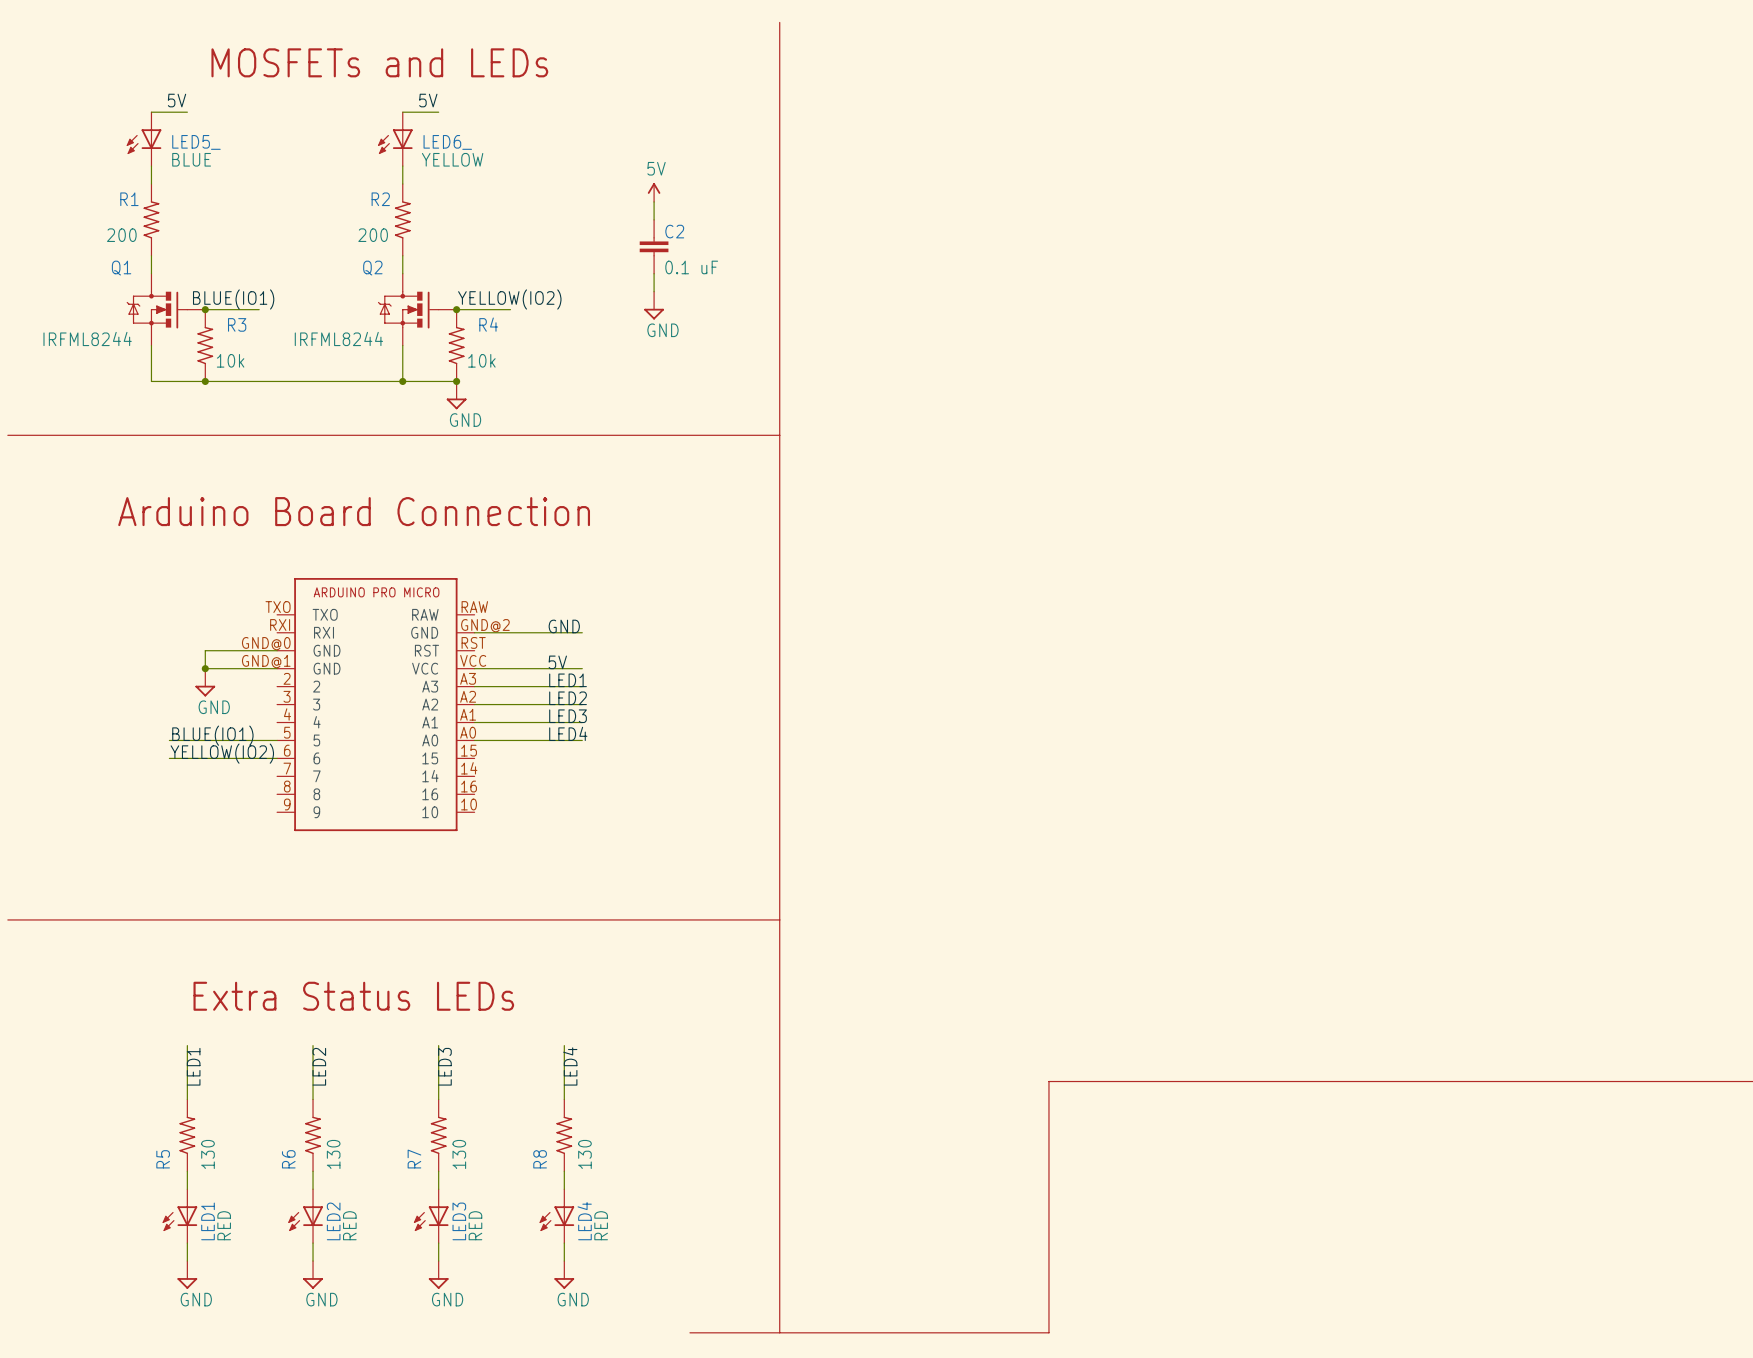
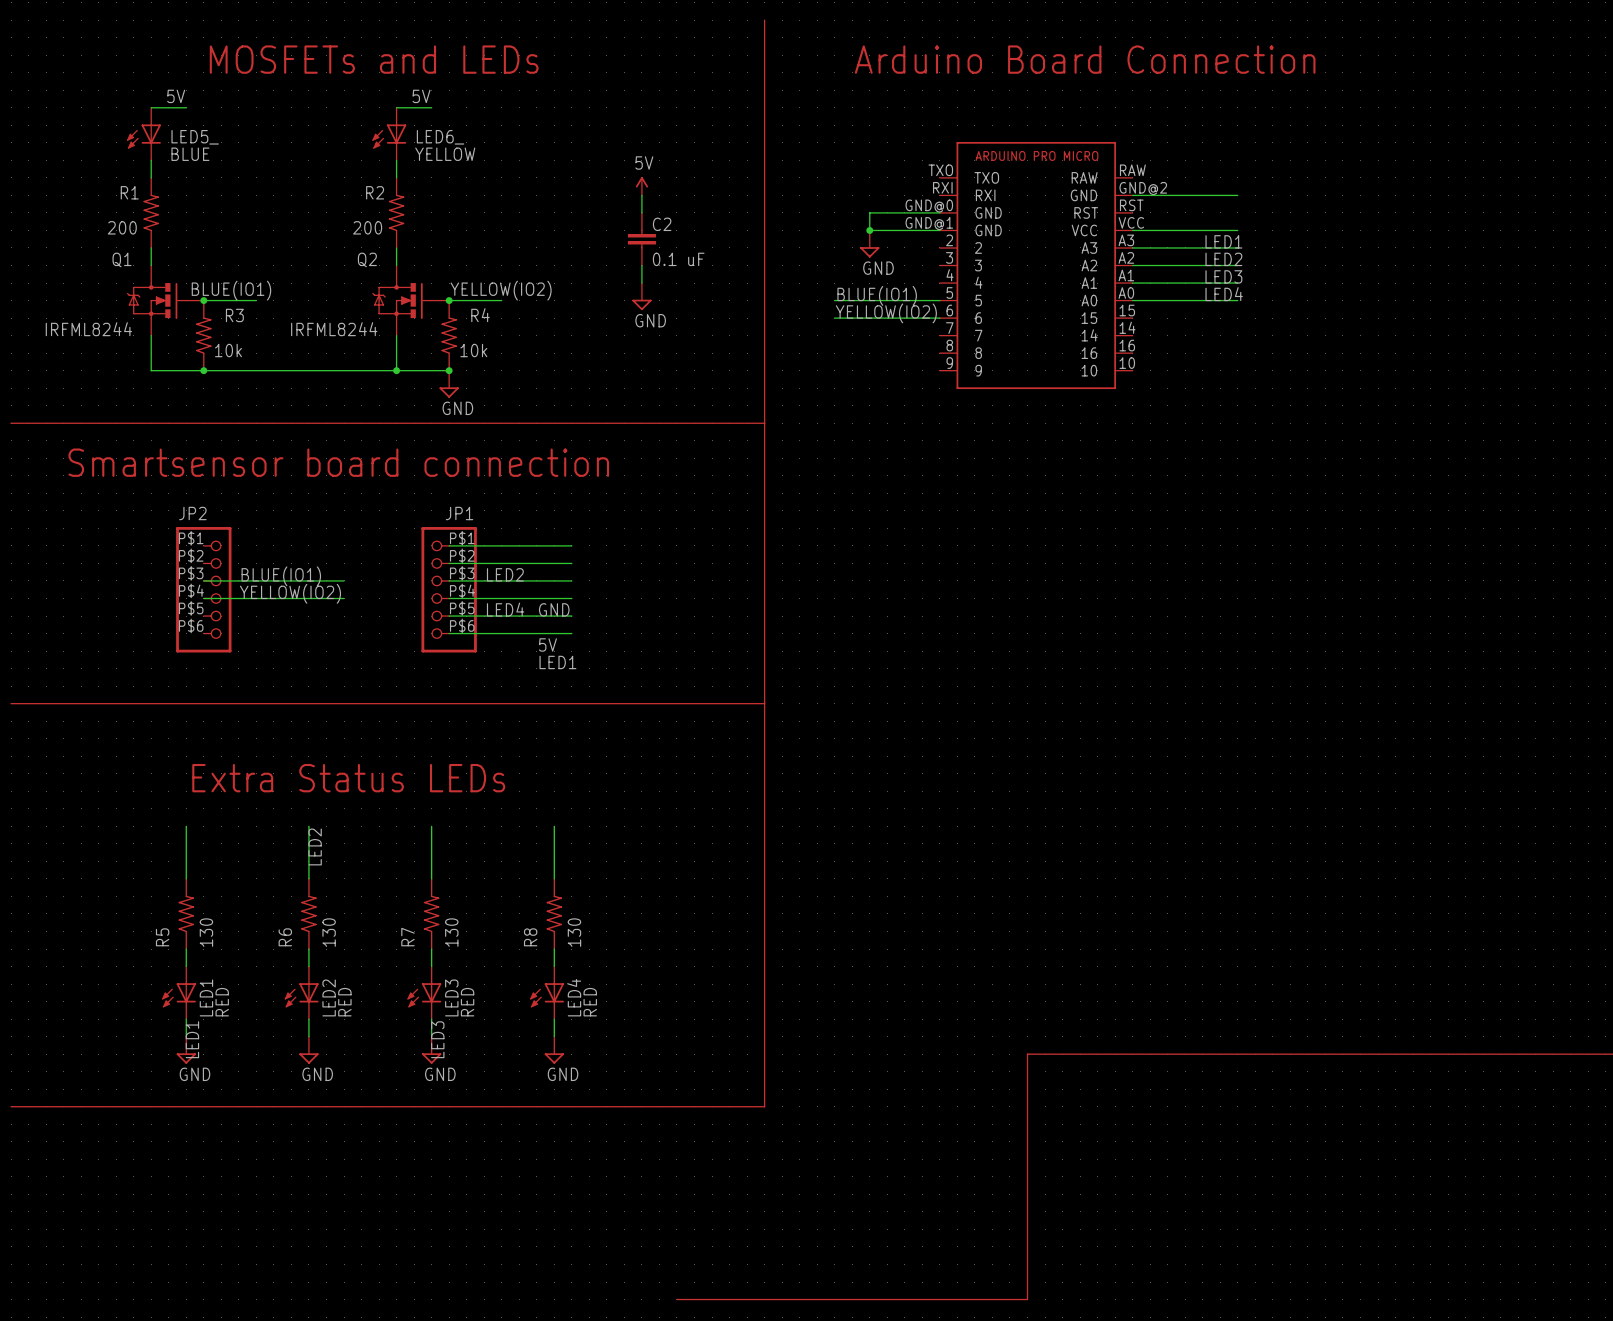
text: none -> Arduino Board Connection (1085, 59)
wire: none -> (1132, 195) (1237, 195)
wire: none -> (939, 212) (869, 212) (869, 230) (939, 230)
junction: none -> (869, 230)
wire: none -> (1132, 230) (1237, 230)
label: none -> LED1 (1223, 241)
power symbol: none -> GND (869, 244)
wire: none -> (1132, 247) (1237, 247)
label: none -> LED2 (1223, 259)
part: none -> (1036, 265)
wire: none -> (1132, 265) (1237, 265)
label: none -> LED3 (1223, 276)
wire: none -> (1132, 283) (1237, 283)
label: none -> LED4 (1224, 294)
label: none -> BLUE(IO1) (877, 295)
wire: none -> (834, 300) (939, 300)
wire: none -> (1132, 300) (1237, 300)
label: none -> YELLOW(IO2) (886, 313)
wire: none -> (834, 318) (939, 318)
text: Arduino Board Connection (354, 511) -> Smartsensor board connection (338, 462)
wire: none -> (449, 545) (571, 545)
wire: none -> (449, 563) (571, 563)
wire: none -> (203, 580) (344, 580)
wire: none -> (449, 580) (571, 580)
JP2: none -> (203, 589)
JP1: none -> (449, 589)
wire: none -> (203, 598) (344, 598)
wire: none -> (449, 598) (571, 598)
wire: (277, 650) (205, 650) (205, 668) (277, 668) -> none
wire: none -> (449, 633) (571, 633)
junction: (205, 668) -> none
wire: (474, 668) (582, 668) -> none
power symbol: GND (205, 682) -> none
wire: (474, 686) (582, 686) -> none
label position: LED2 (568, 698) -> LED2 (505, 574)
part: (375, 704) -> none
wire: (474, 704) (582, 704) -> none
label: LED3 (568, 716) -> none
line: none -> (11, 703) (764, 703)
label position: LED4 (568, 733) -> LED4 (505, 609)
label position: BLUE(IO1) (212, 735) -> BLUE(IO1) (281, 576)
wire: (169, 740) (277, 740) -> none
wire: (474, 740) (582, 740) -> none
label position: YELLOW(IO2) (222, 753) -> YELLOW(IO2) (290, 593)
wire: (169, 758) (277, 758) -> none
text: none -> Extra Status LEDs (348, 778)
wire: none -> (186, 826) (186, 878)
wire: none -> (308, 826) (308, 878)
wire: none -> (431, 826) (431, 878)
wire: none -> (554, 826) (554, 878)
label: none -> LED2 (315, 846)
line: (7, 919) (779, 919) -> none
wire: none -> (186, 949) (186, 966)
wire: none -> (308, 949) (308, 966)
wire: none -> (431, 949) (431, 966)
wire: none -> (554, 949) (554, 966)
text: Extra Status LEDs (353, 996) -> none
label: LED2 (319, 1066) -> none
label: LED4 (570, 1066) -> none
power symbol: none -> GND (186, 1050)
power symbol: none -> GND (308, 1050)
power symbol: none -> GND (431, 1050)
power symbol: none -> GND (554, 1050)
R5 position: (187, 1135) -> (186, 913)
R6 position: (313, 1135) -> (308, 913)
R7 position: (438, 1135) -> (431, 913)
R8 position: (564, 1135) -> (554, 913)
line: (779, 1135) (779, 1332) -> (764, 1106) (11, 1106)
wire: (187, 1171) (187, 1189) -> none
wire: (313, 1171) (313, 1189) -> none
wire: (438, 1171) (438, 1189) -> none
wire: (564, 1171) (564, 1189) -> none
LED1 position: (179, 1216) -> (179, 992)
LED2 position: (305, 1216) -> (301, 992)
LED3 position: (431, 1216) -> (424, 992)
LED4 position: (556, 1216) -> (547, 992)
wire: (187, 1243) (187, 1261) -> none
wire: (313, 1243) (313, 1261) -> none
wire: (438, 1243) (438, 1261) -> none
wire: (564, 1243) (564, 1261) -> none
power symbol: GND (187, 1274) -> none
power symbol: GND (313, 1274) -> none
power symbol: GND (438, 1274) -> none
power symbol: GND (564, 1274) -> none

